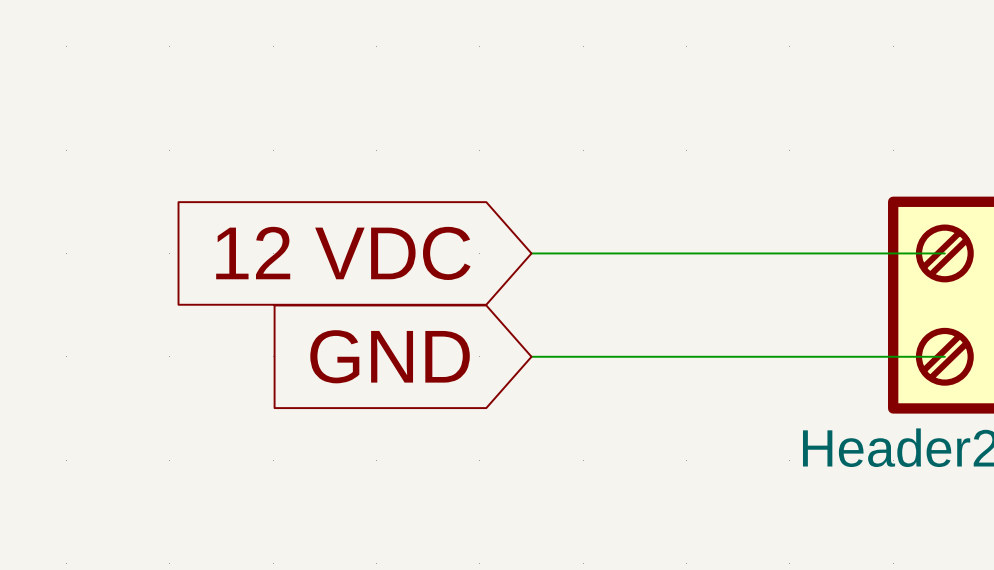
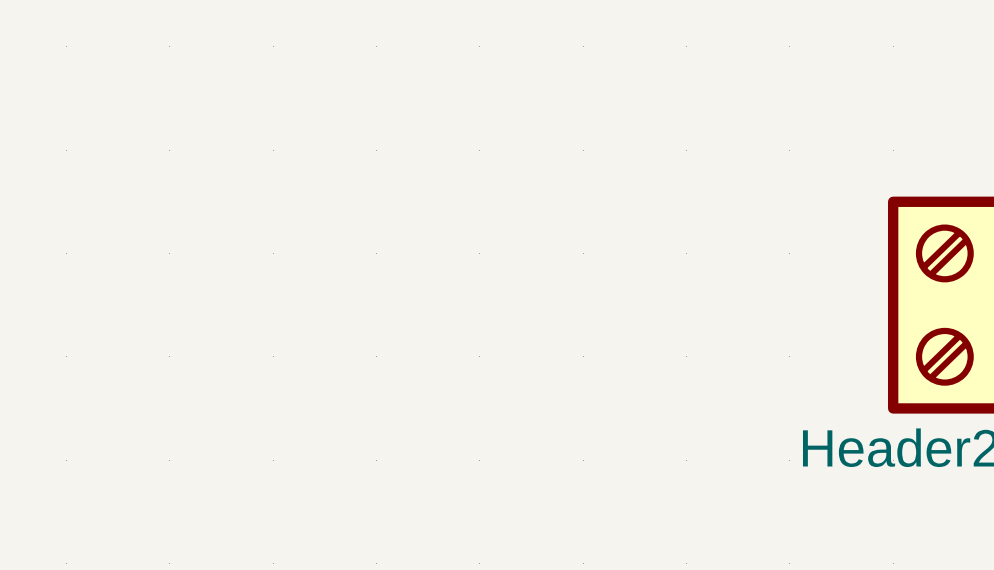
global label: 12 VDC (343, 253) -> none
wire: (531, 253) (944, 253) -> none
global label: GND (390, 356) -> none
wire: (531, 356) (944, 356) -> none

